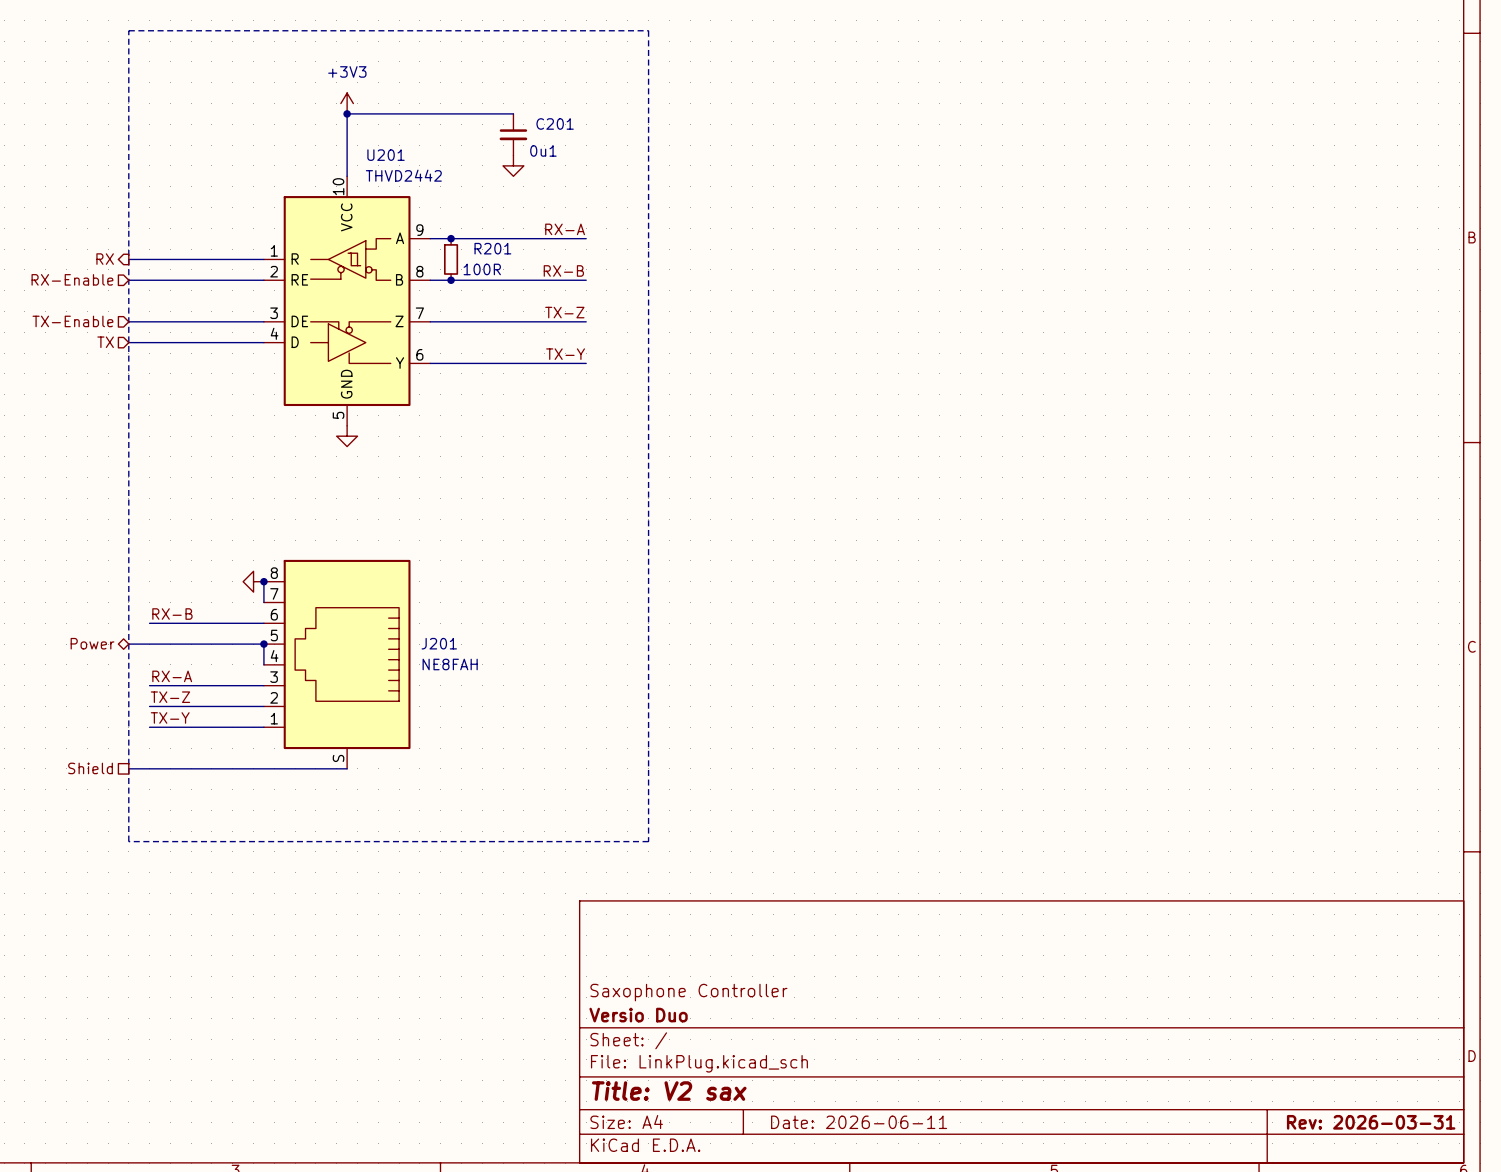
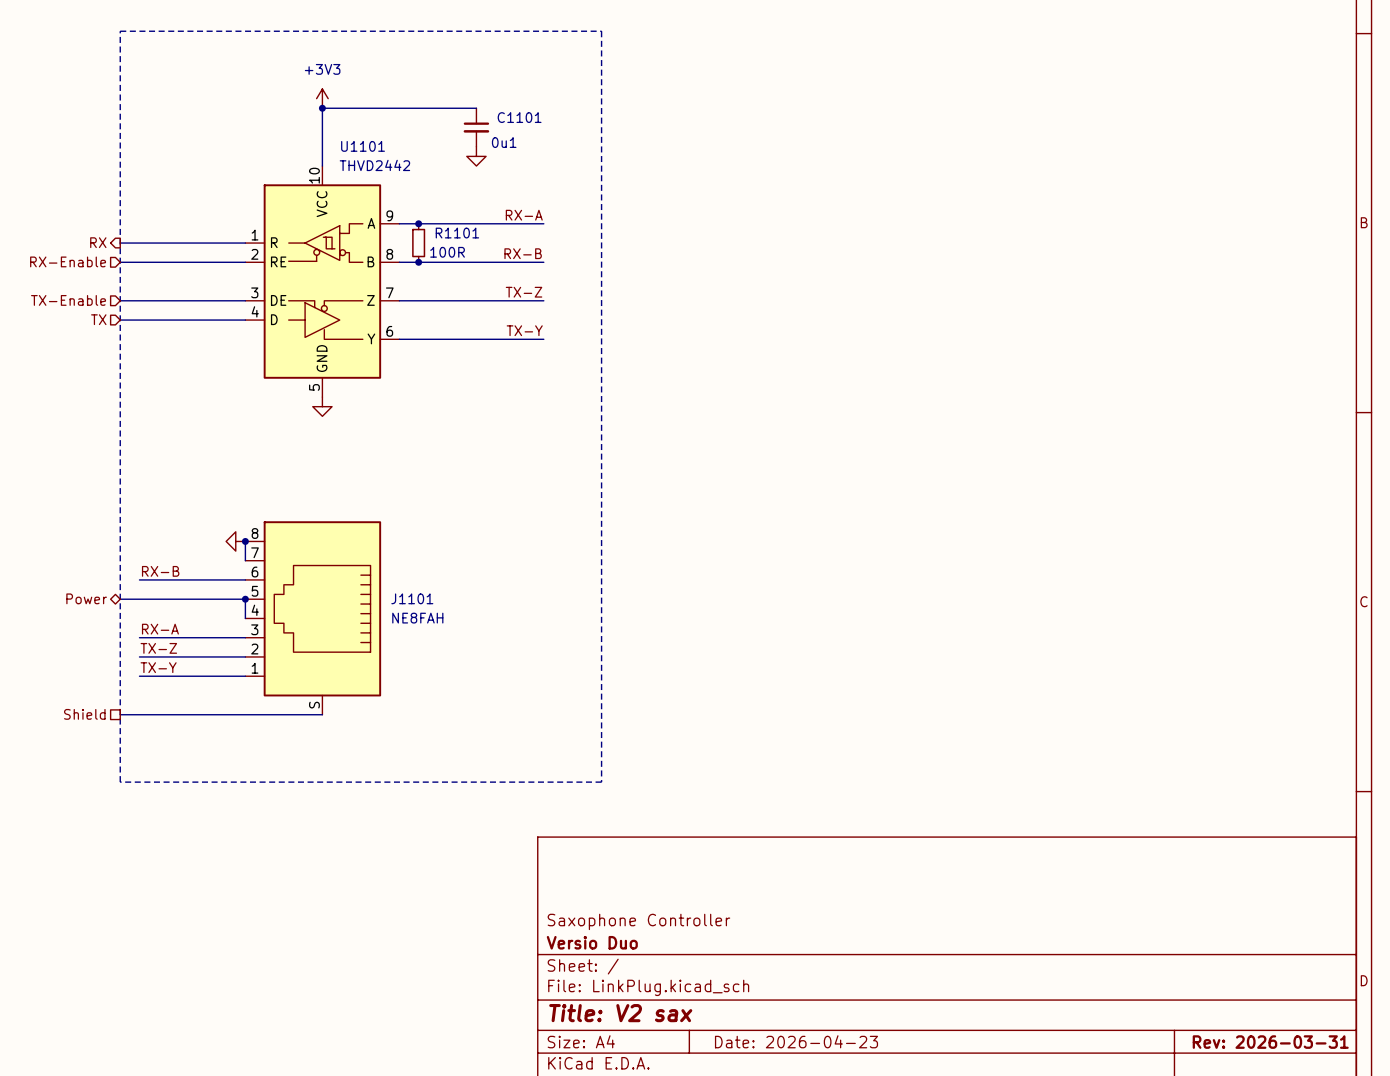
C201 name: C201 (555, 123) -> C1101 (519, 117)
U201 name: U201 (386, 155) -> U1101 (363, 146)
R201 name: R201 (492, 248) -> R1101 (457, 233)
J201 name: J201 (439, 643) -> J1101 (412, 598)
title block: Date: 2026-06-11 (859, 1122) -> Date: 2026-04-23 (796, 1041)

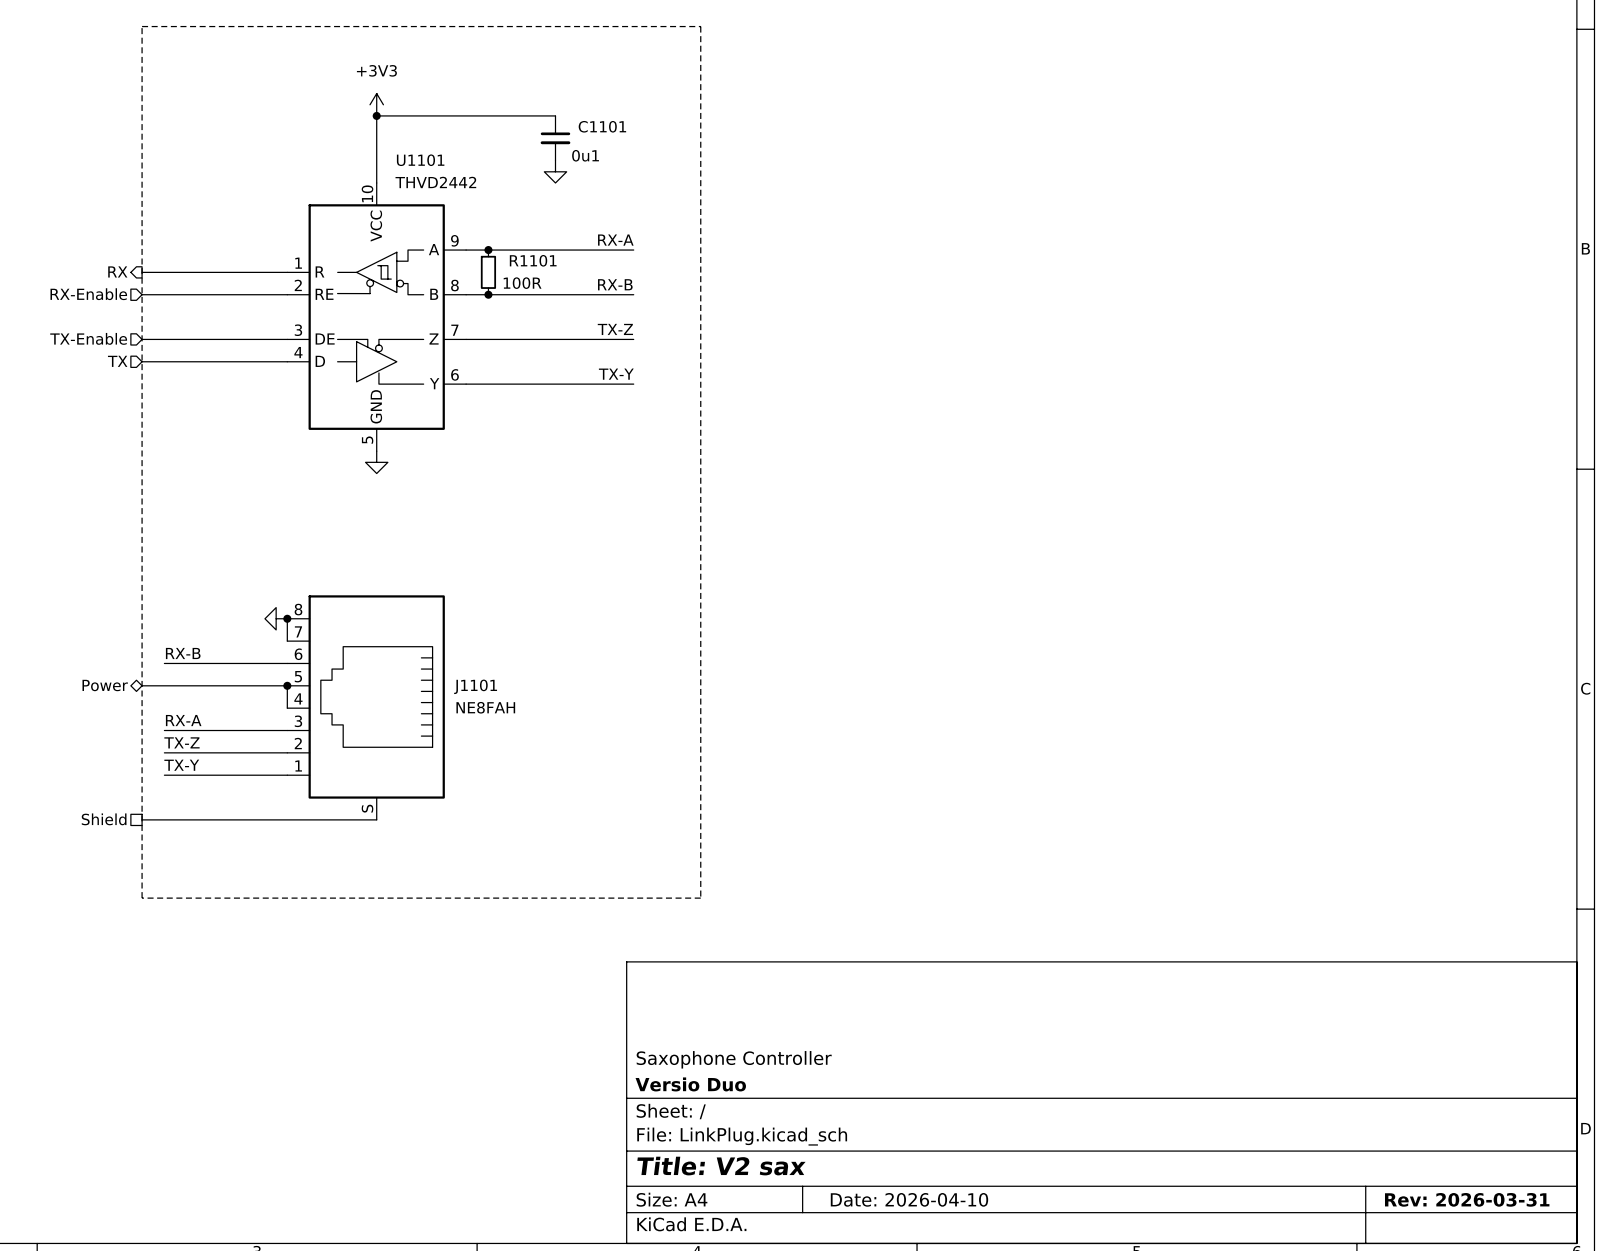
title block: Date: 2026-04-23 (796, 1041) -> Date: 2026-04-10 (909, 1199)

